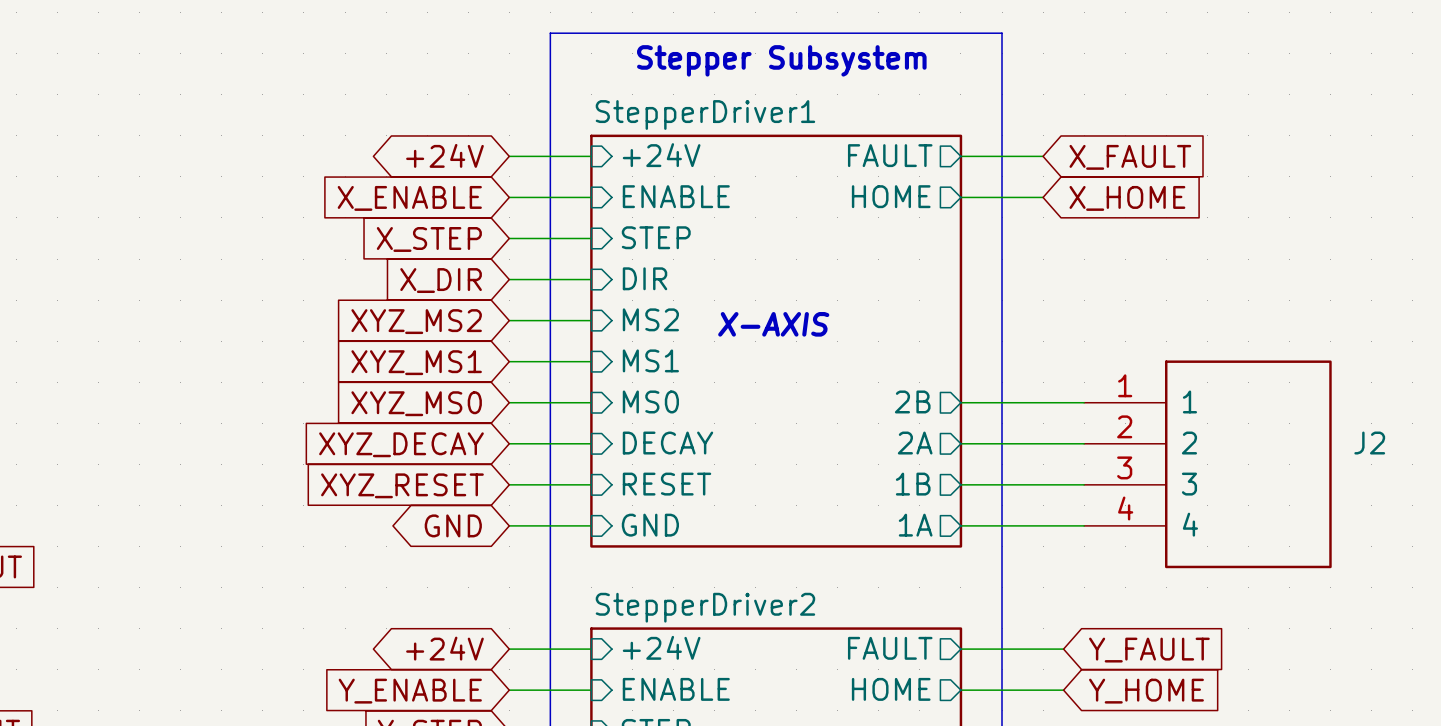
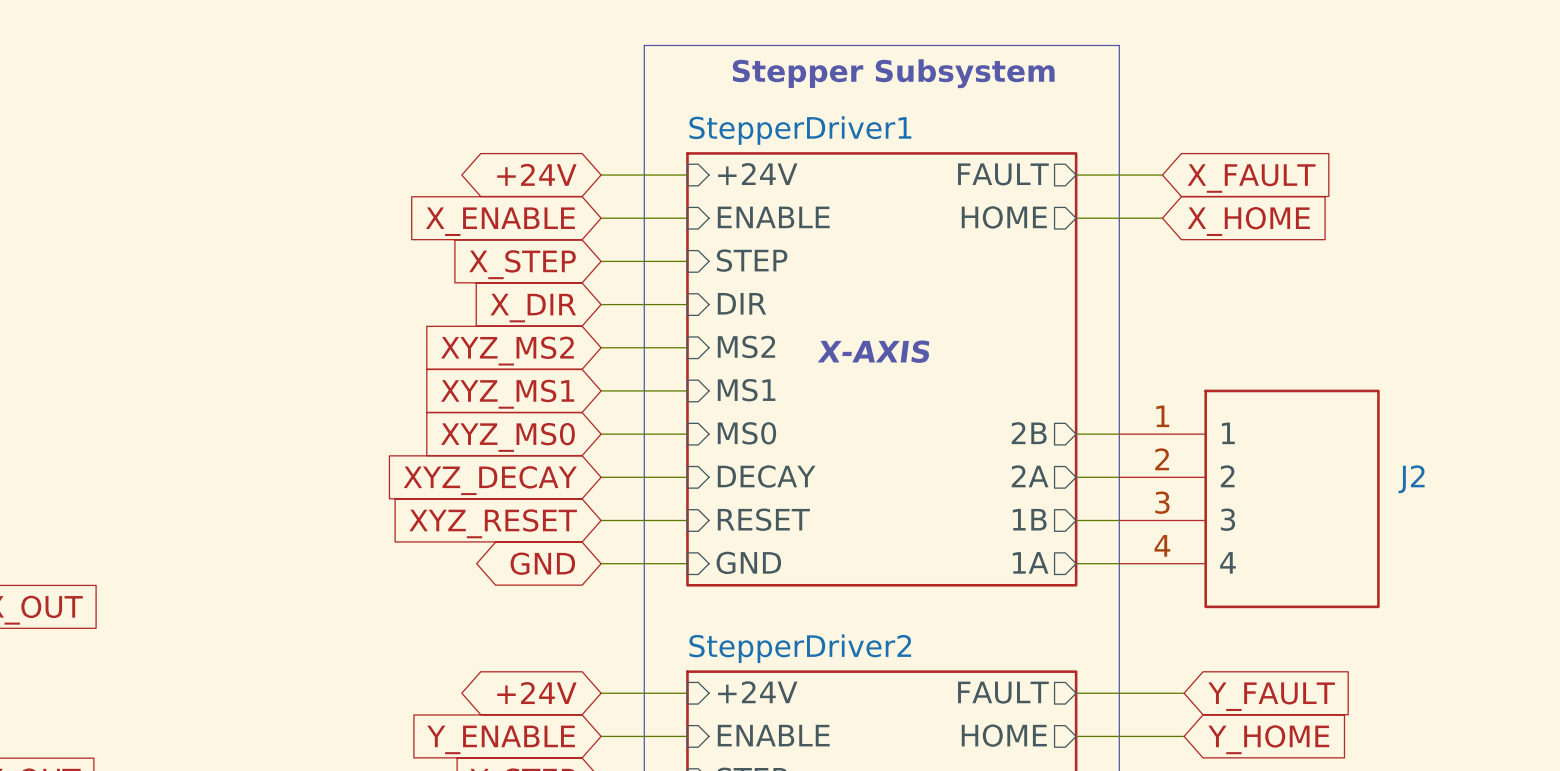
J2 position: (1207, 464) -> (1249, 498)

